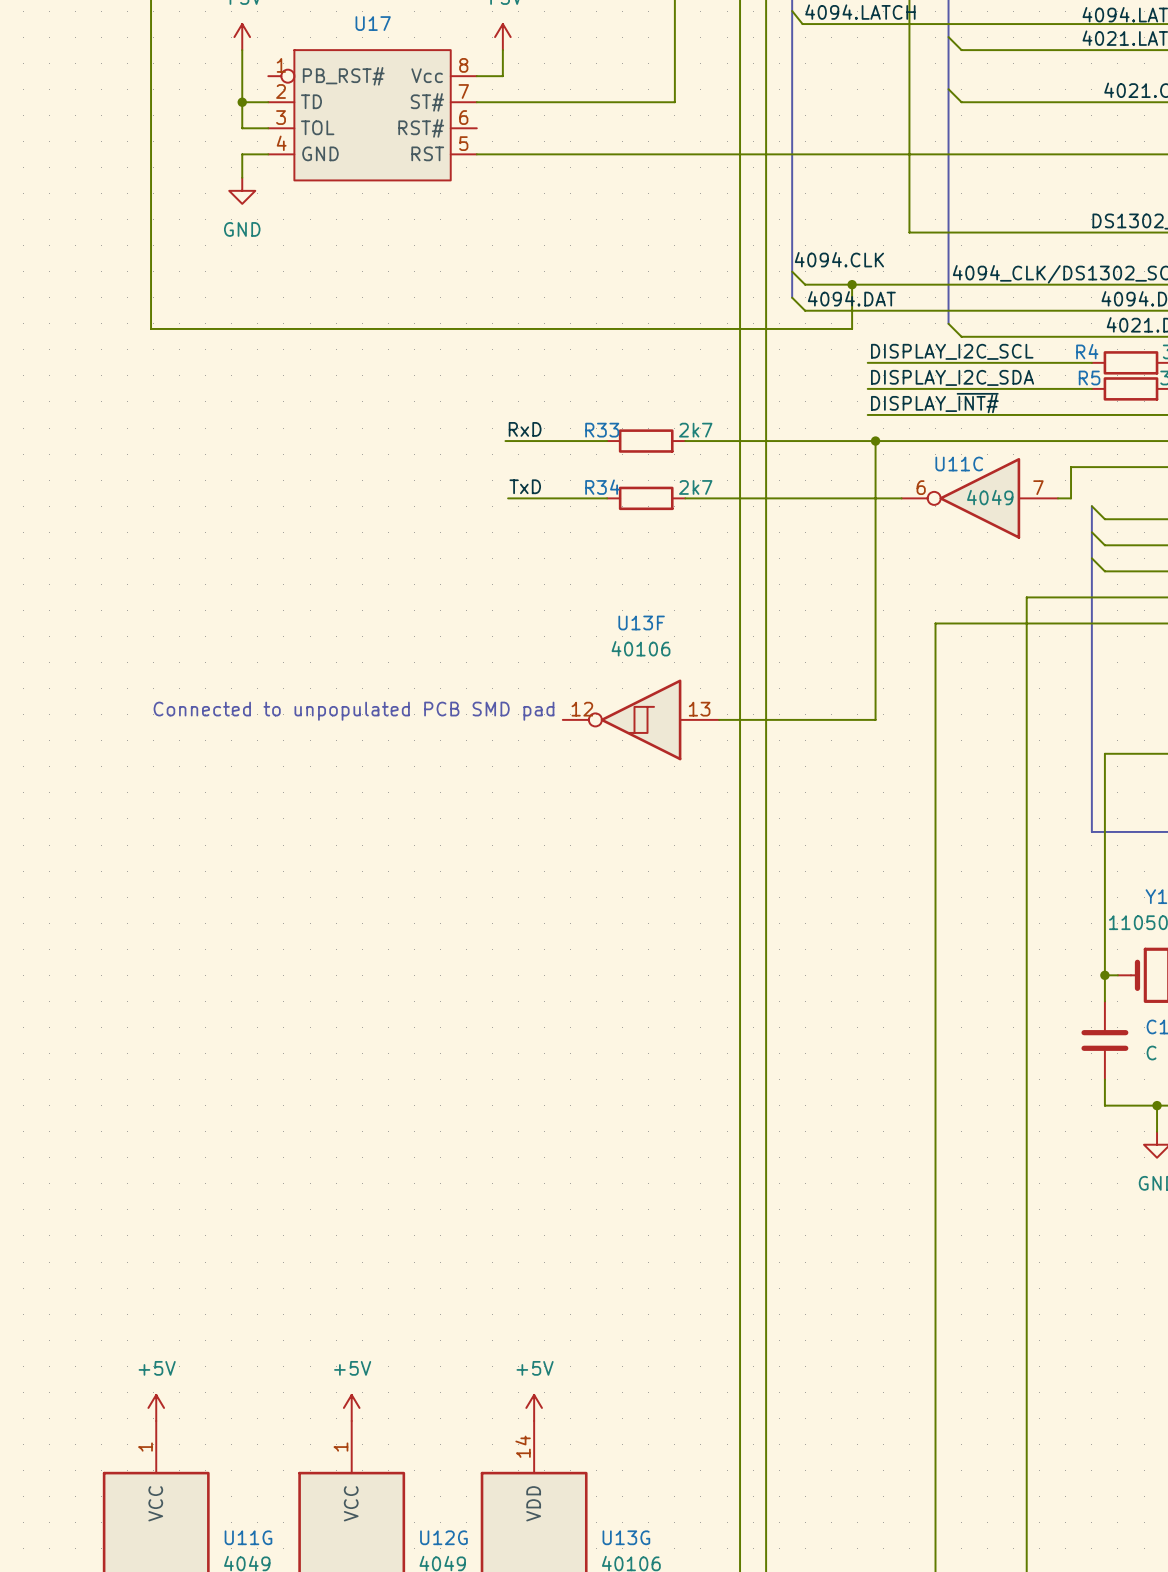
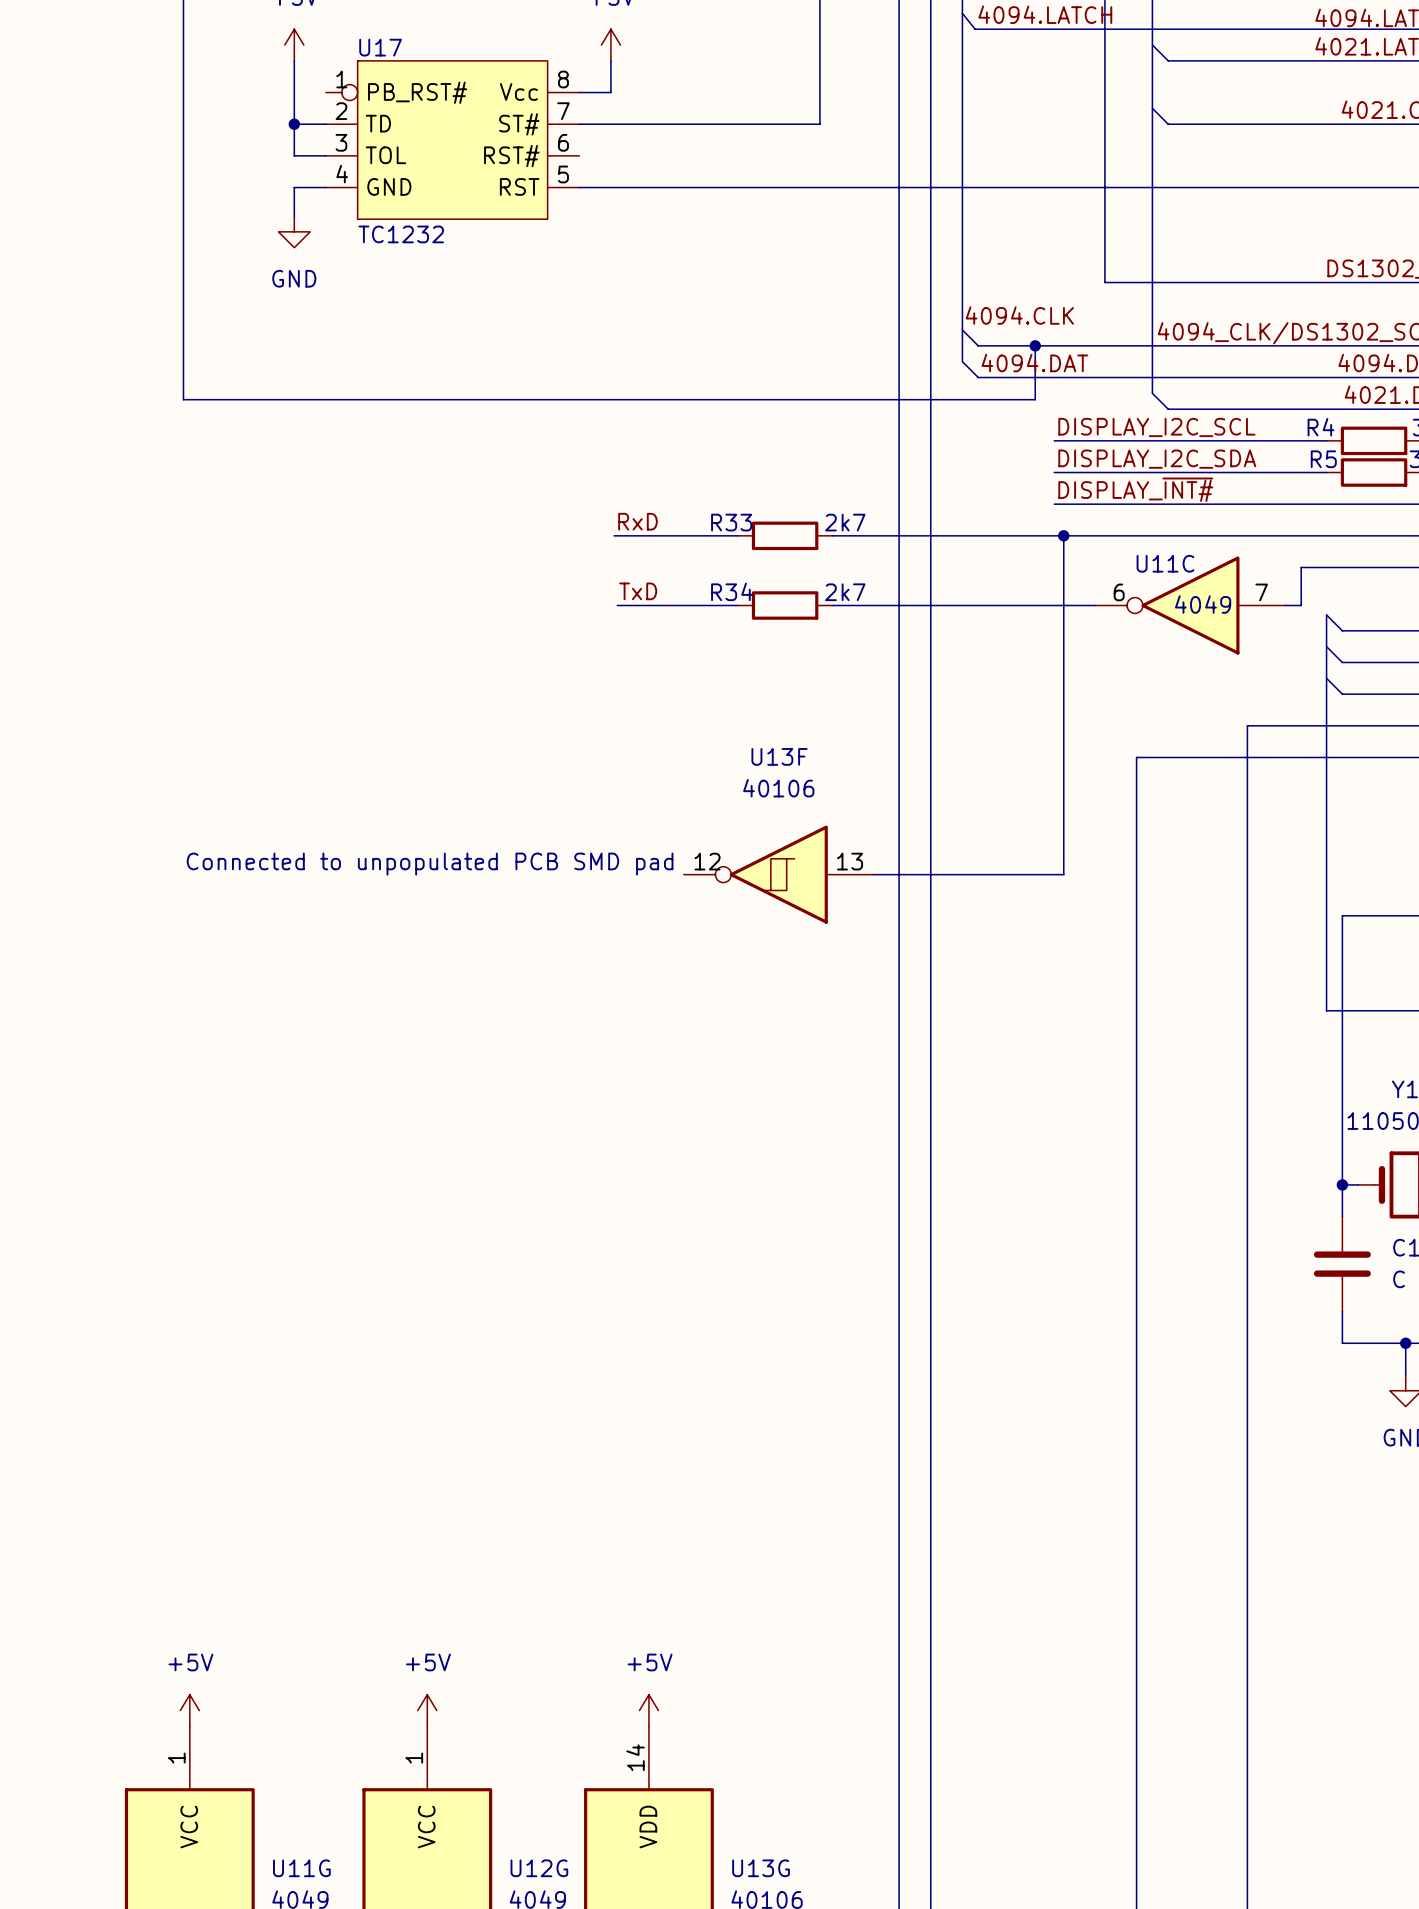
U17 name position: U17 (373, 23) -> U17 (380, 47)
U17 value: none -> TC1232 (401, 234)

